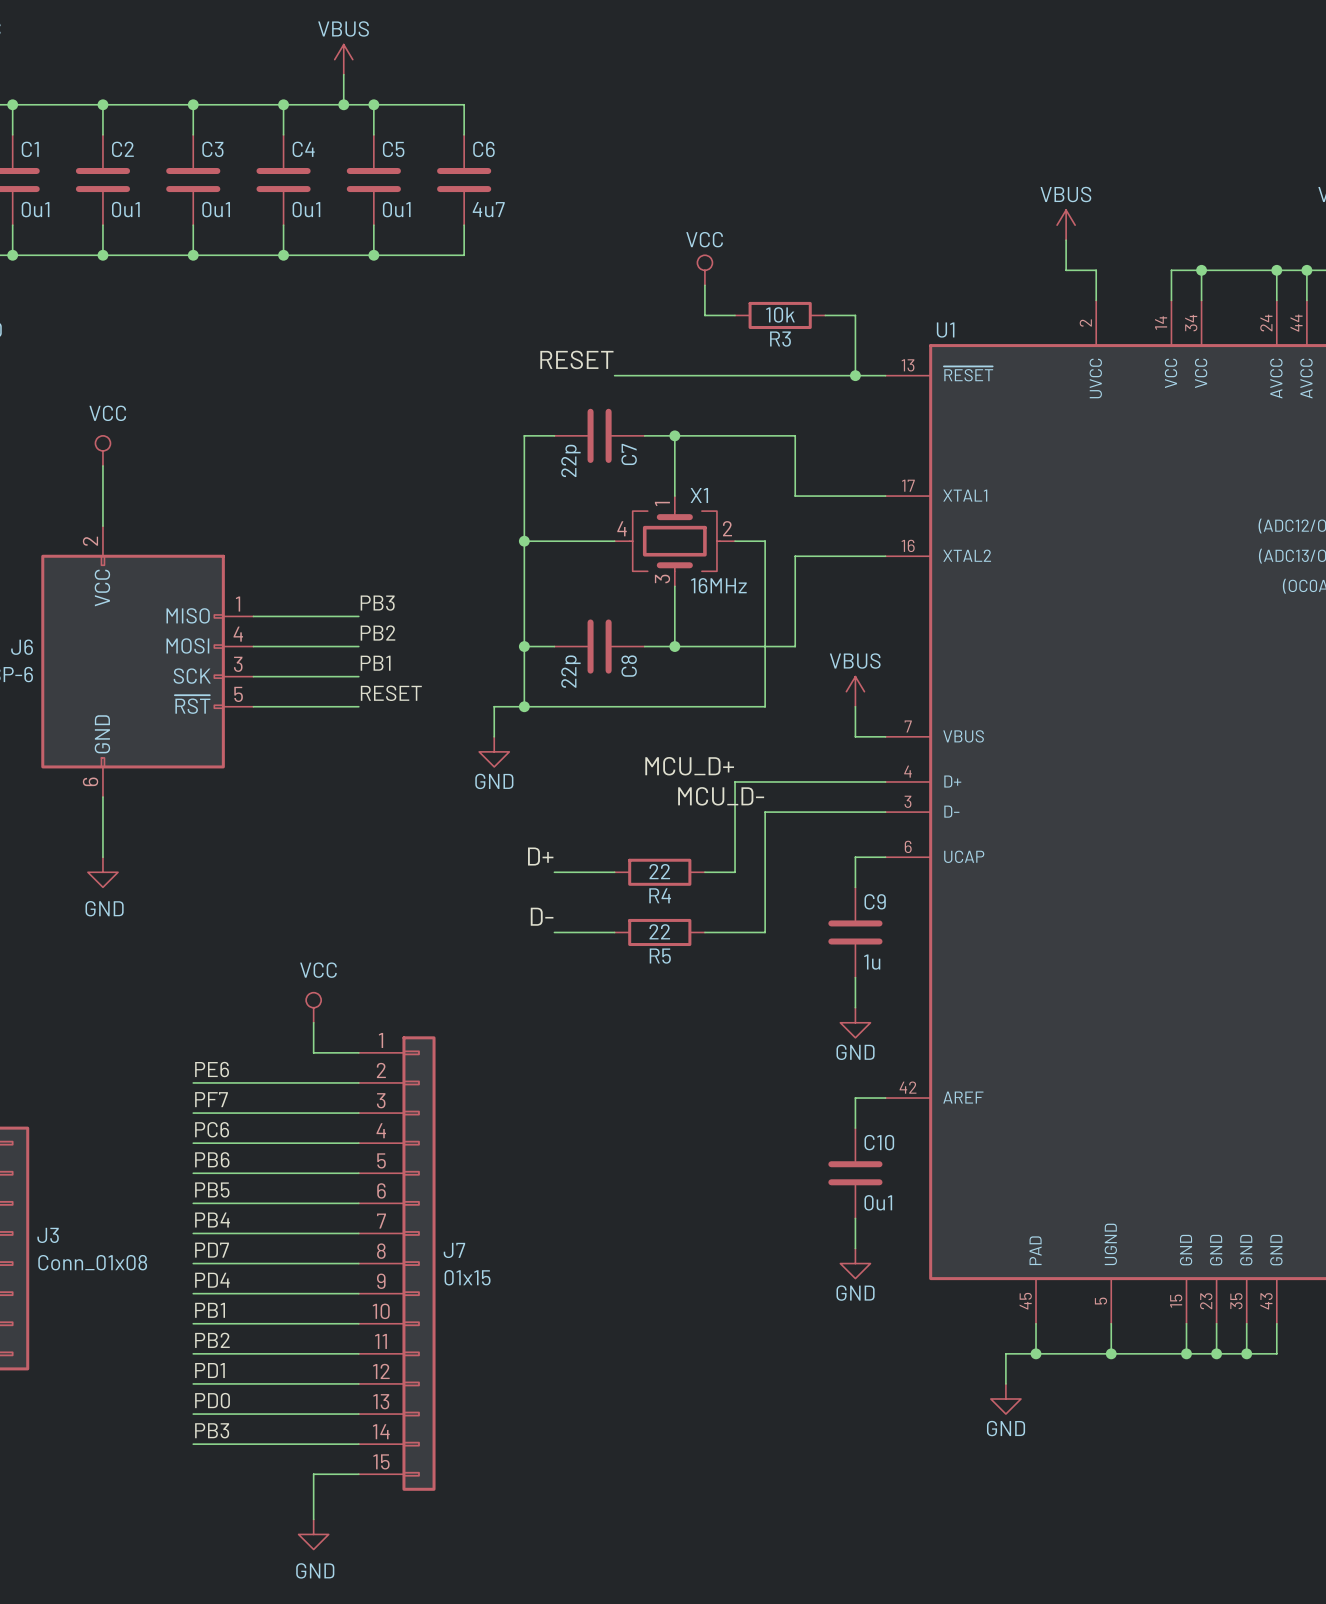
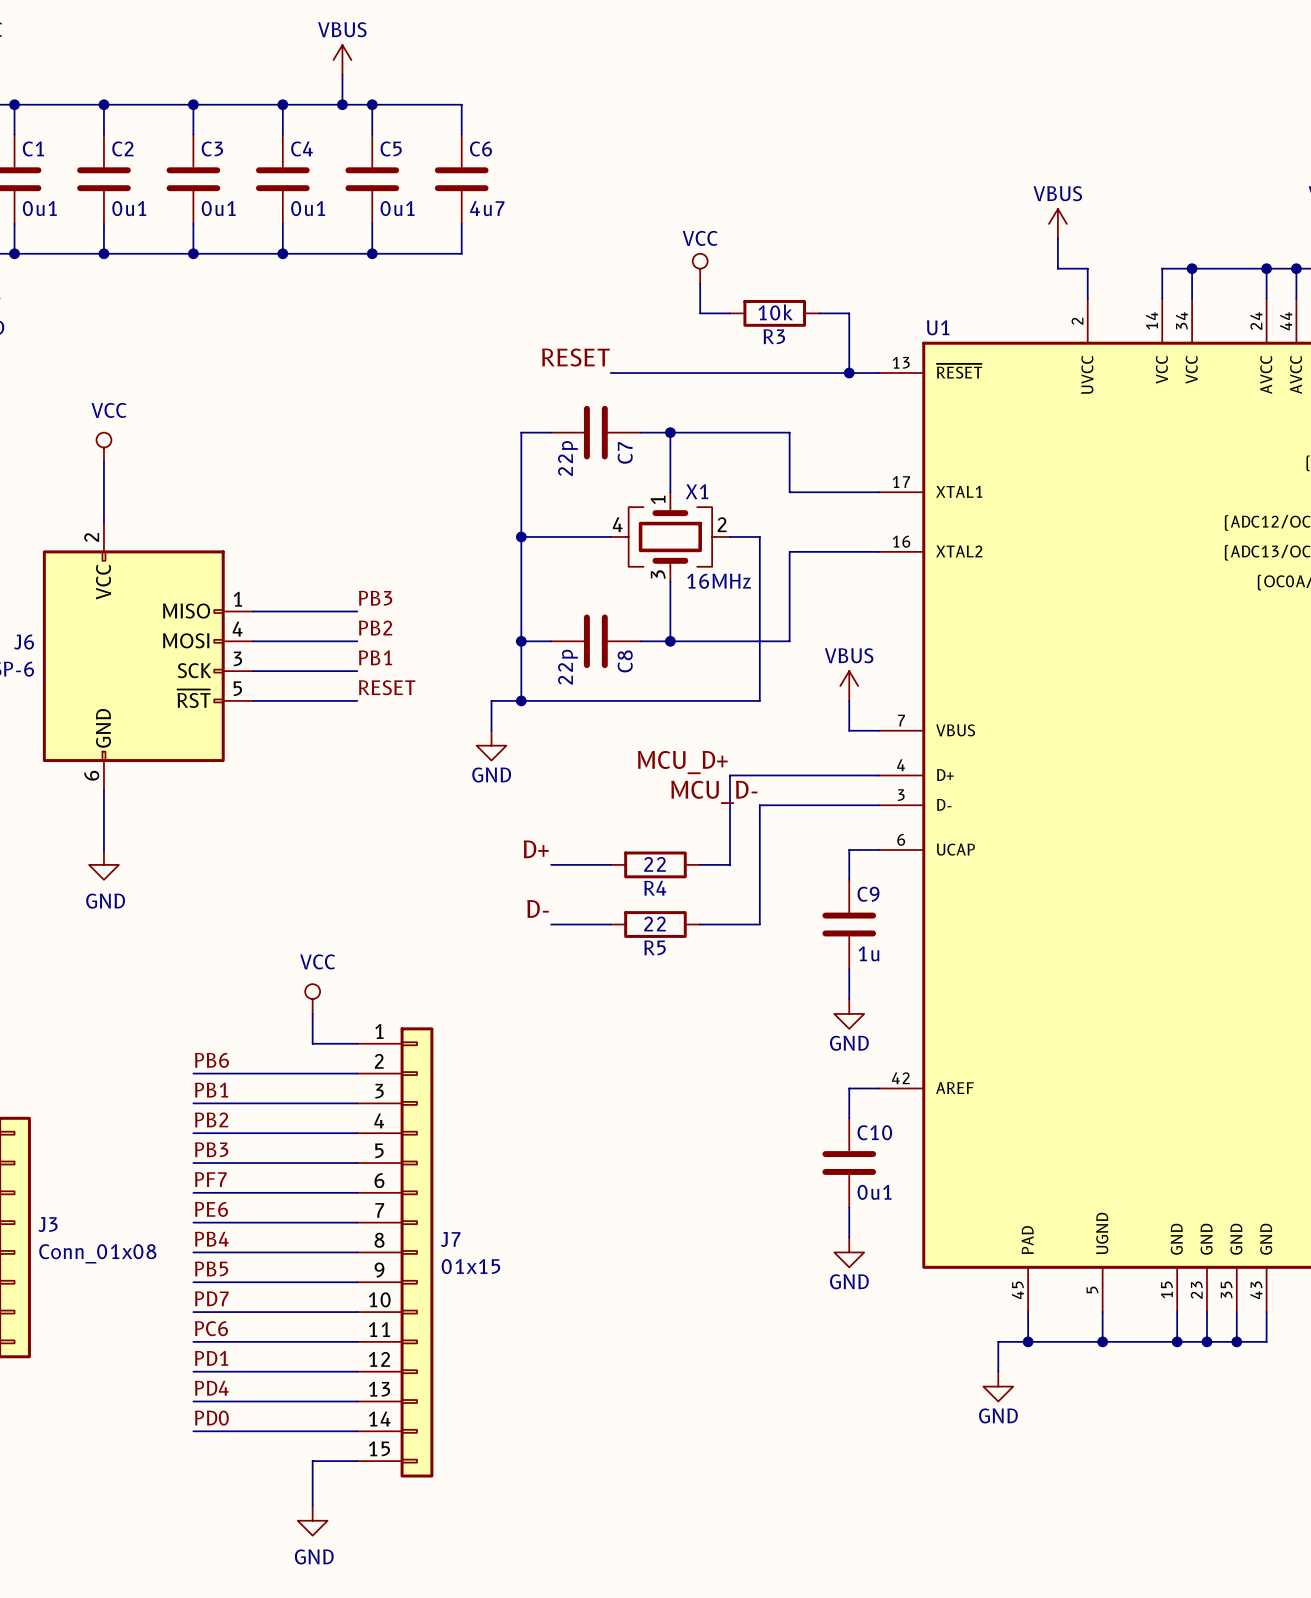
label: PE6 (212, 1069) -> PB6 (211, 1060)
label: PF7 (211, 1099) -> PB1 (211, 1090)
label: PC6 (212, 1129) -> PB2 (211, 1119)
label: PB6 (212, 1159) -> PB3 (211, 1149)
label: PB5 (212, 1190) -> PF7 (210, 1179)
label: PB4 (212, 1220) -> PE6 (211, 1209)
label: PD7 (212, 1250) -> PB4 (211, 1239)
label: PD4 (212, 1280) -> PB5 (211, 1268)
label: PB1 (210, 1310) -> PD7 (211, 1298)
label: PB2 (212, 1340) -> PC6 (211, 1328)
label: PD0 (212, 1400) -> PD4 (211, 1388)
label: PB3 (212, 1430) -> PD0 (211, 1418)

